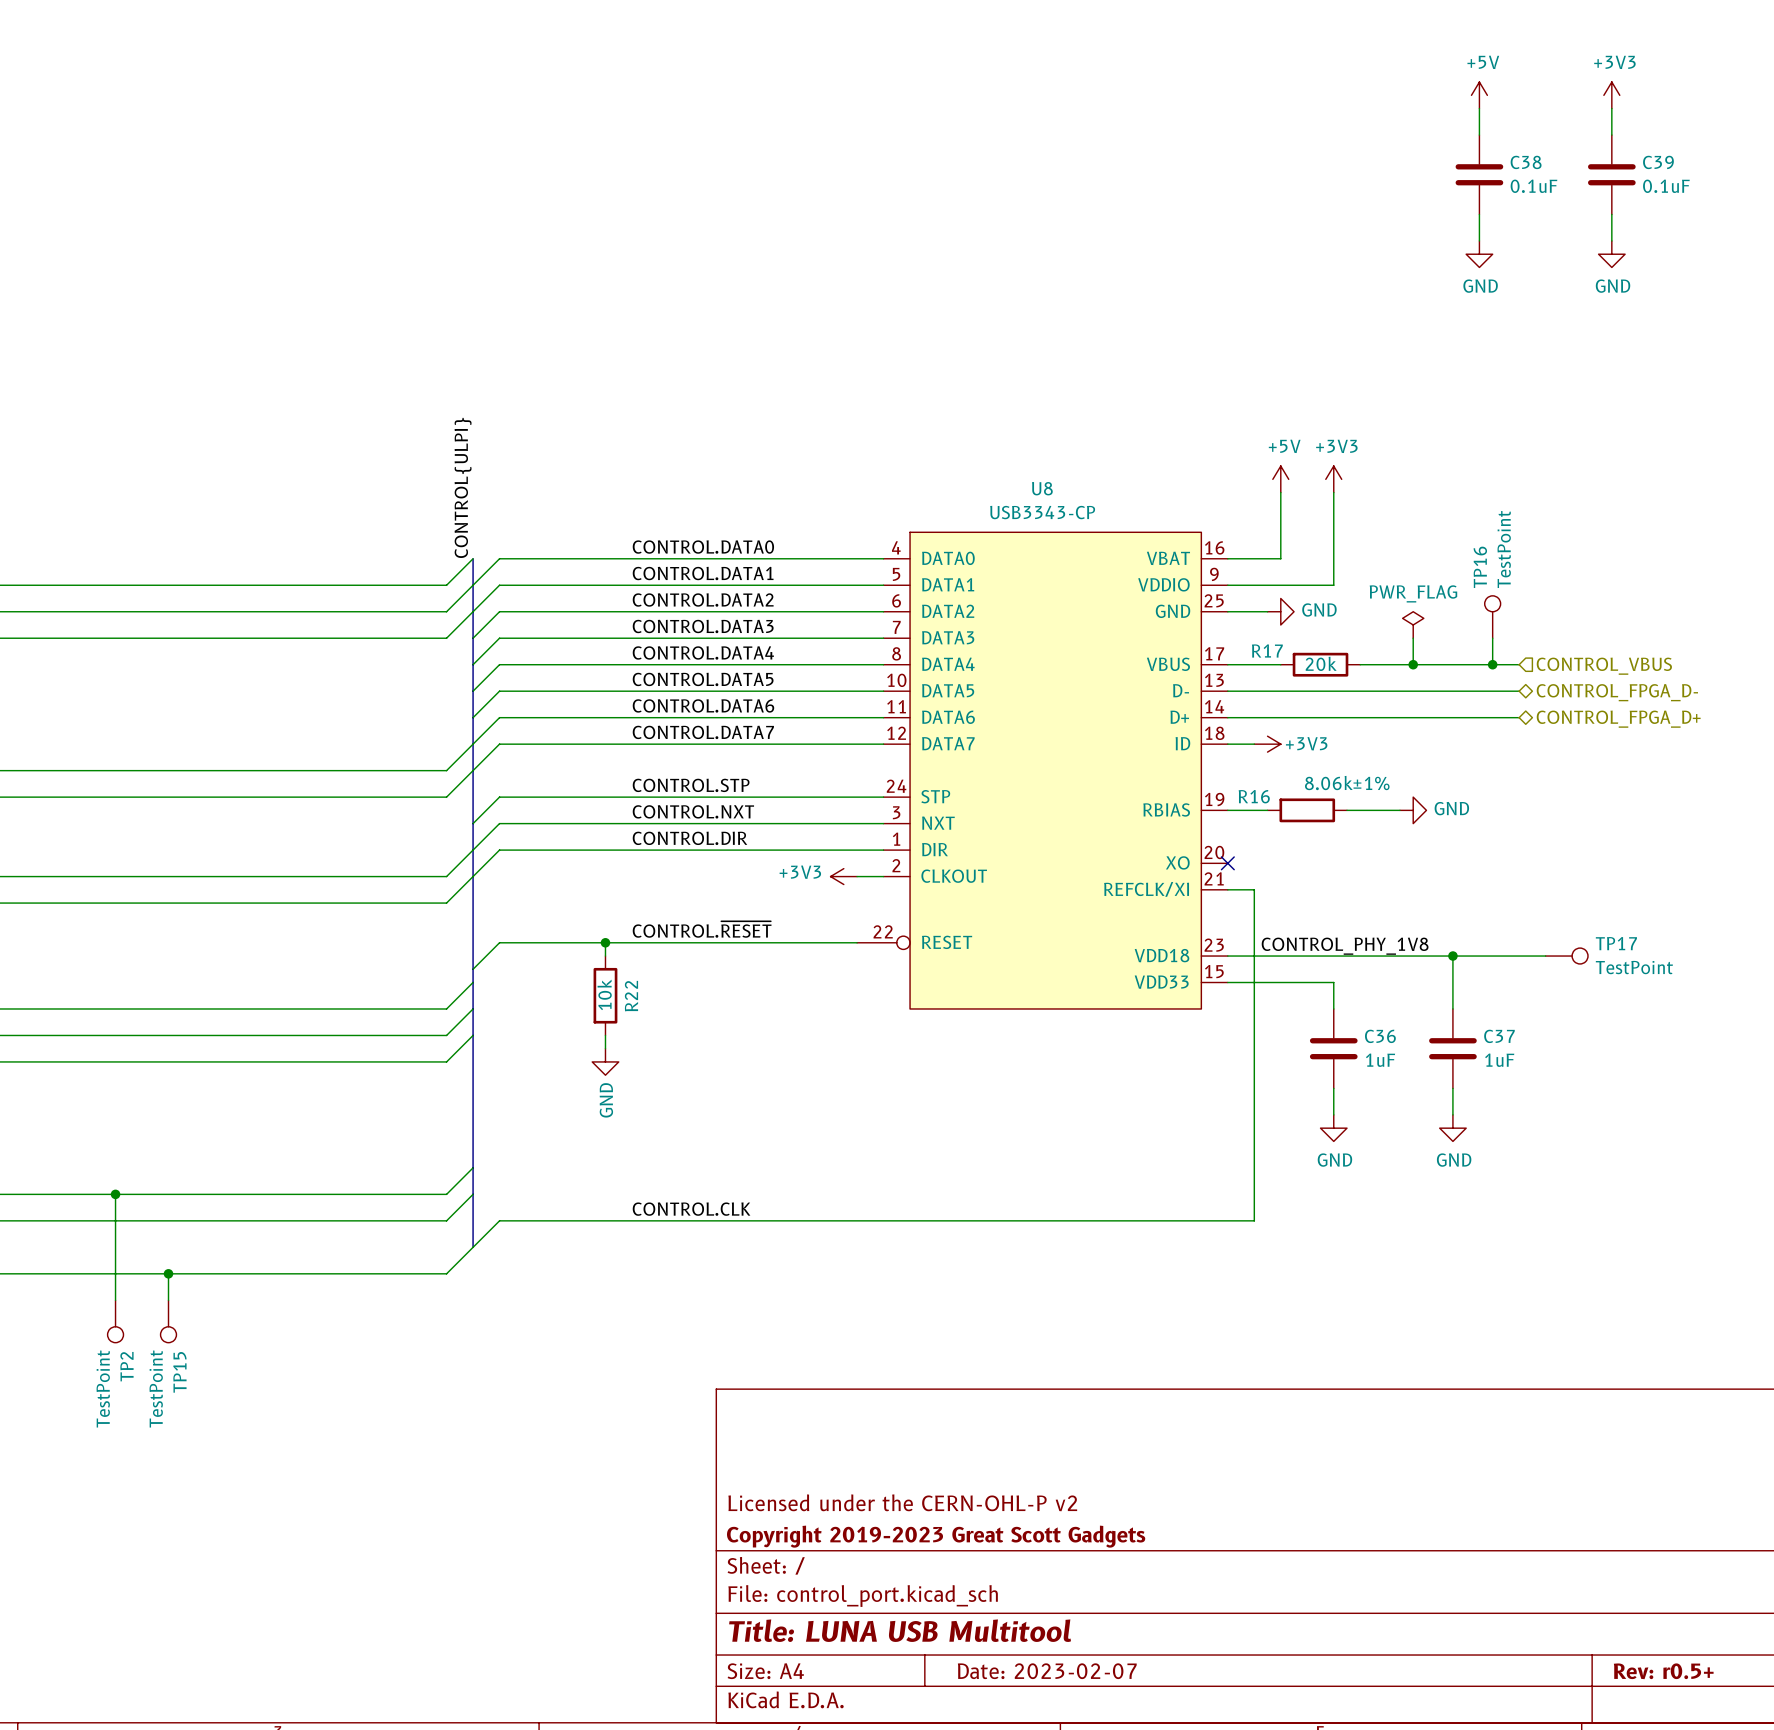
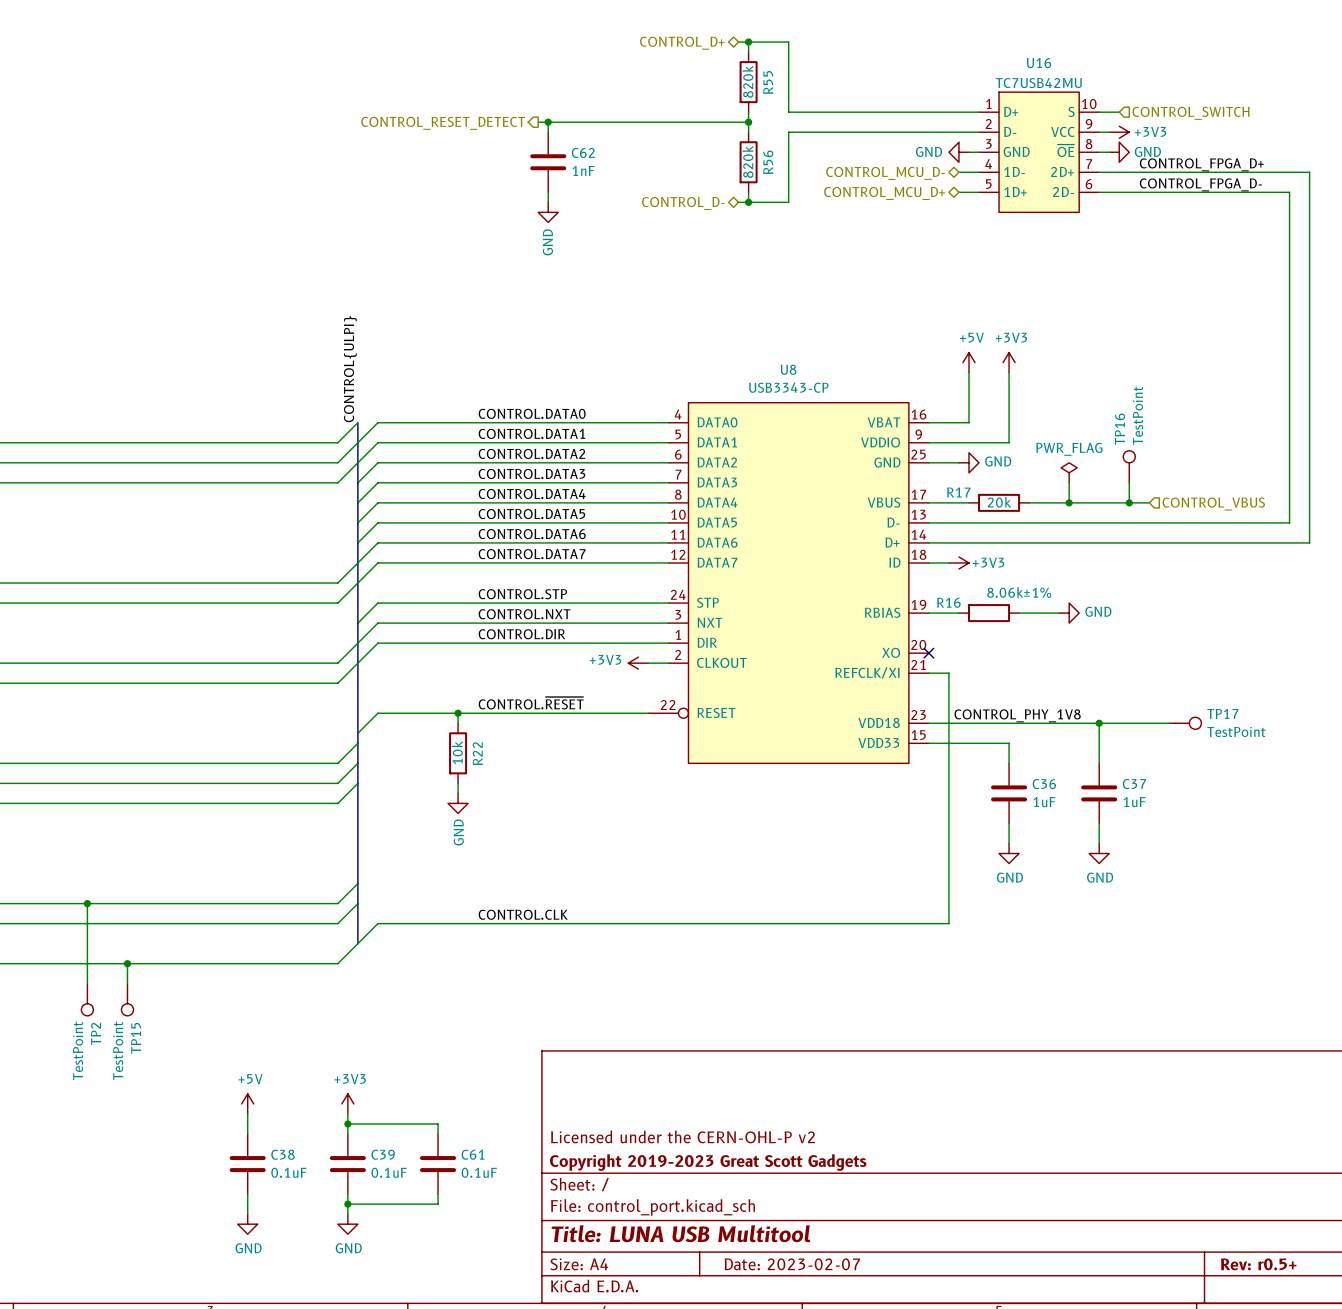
wire: none -> (738, 42) (788, 42) (788, 112) (979, 112)
wire: none -> (748, 42) (748, 52)
junction: none -> (748, 42)
hierarchical label: none -> CONTROL_D+ (682, 43)
power symbol: +5V (1479, 95) -> none
power symbol rotation: 0° (1611, 95) -> 90° clockwise (1119, 132)
power symbol position: +3V3 (1611, 95) -> +3V3 (1119, 132)
R55: none -> 820k (748, 82)
wire: (1479, 108) (1479, 135) -> none
wire: (1611, 108) (1611, 135) -> none
wire: none -> (748, 112) (748, 132)
wire: none -> (1099, 112) (1119, 112)
hierarchical label: none -> CONTROL_SWITCH (1190, 113)
wire: none -> (538, 122) (748, 122)
wire: none -> (548, 122) (548, 132)
junction: none -> (548, 122)
junction: none -> (748, 122)
hierarchical label: none -> CONTROL_RESET_DETECT (443, 123)
wire: none -> (979, 132) (788, 132) (788, 202) (738, 202)
wire: none -> (1099, 132) (1109, 132)
C38 position: (1479, 174) -> (247, 1164)
C39 position: (1611, 174) -> (347, 1164)
power symbol: none -> GND (958, 152)
wire: none -> (968, 152) (979, 152)
U16: none -> TC7USB42MU (1039, 152)
wire: none -> (1099, 152) (1109, 152)
C62: none -> 1nF (548, 162)
R56: none -> 820k (748, 162)
wire: (1479, 214) (1479, 240) -> none
wire: (1611, 214) (1611, 240) -> none
label: none -> CONTROL_FPGA_D+ (1201, 164)
wire: none -> (958, 172) (979, 172)
wire: none -> (1099, 172) (1309, 172) (1309, 542) (1149, 542)
hierarchical label: none -> CONTROL_MCU_D- (885, 173)
label: none -> CONTROL_FPGA_D- (1200, 184)
wire: none -> (548, 192) (548, 202)
wire: none -> (748, 192) (748, 202)
wire: none -> (958, 192) (979, 192)
wire: none -> (1099, 192) (1289, 192) (1289, 522) (1149, 522)
power symbol rotation: 0° (1479, 254) -> 90° counterclockwise (1119, 152)
power symbol position: GND (1479, 254) -> GND (1119, 152)
power symbol: GND (1611, 254) -> none
hierarchical label: none -> CONTROL_MCU_D+ (884, 193)
junction: none -> (748, 202)
hierarchical label: none -> CONTROL_D- (683, 203)
power symbol: none -> GND (548, 212)
hierarchical label: CONTROL_FPGA_D- (1617, 692) -> none
hierarchical label: CONTROL_FPGA_D+ (1618, 719) -> none
power symbol: none -> +5V (247, 1103)
power symbol: none -> +3V3 (347, 1103)
wire: none -> (247, 1113) (247, 1134)
wire: none -> (347, 1113) (347, 1134)
wire: none -> (347, 1123) (438, 1123) (438, 1134)
junction: none -> (347, 1123)
C61: none -> 0.1uF (438, 1164)
wire: none -> (247, 1194) (247, 1214)
wire: none -> (347, 1194) (347, 1214)
wire: none -> (438, 1194) (438, 1204) (347, 1204)
junction: none -> (347, 1204)
power symbol: none -> GND (247, 1224)
power symbol: none -> GND (347, 1224)

